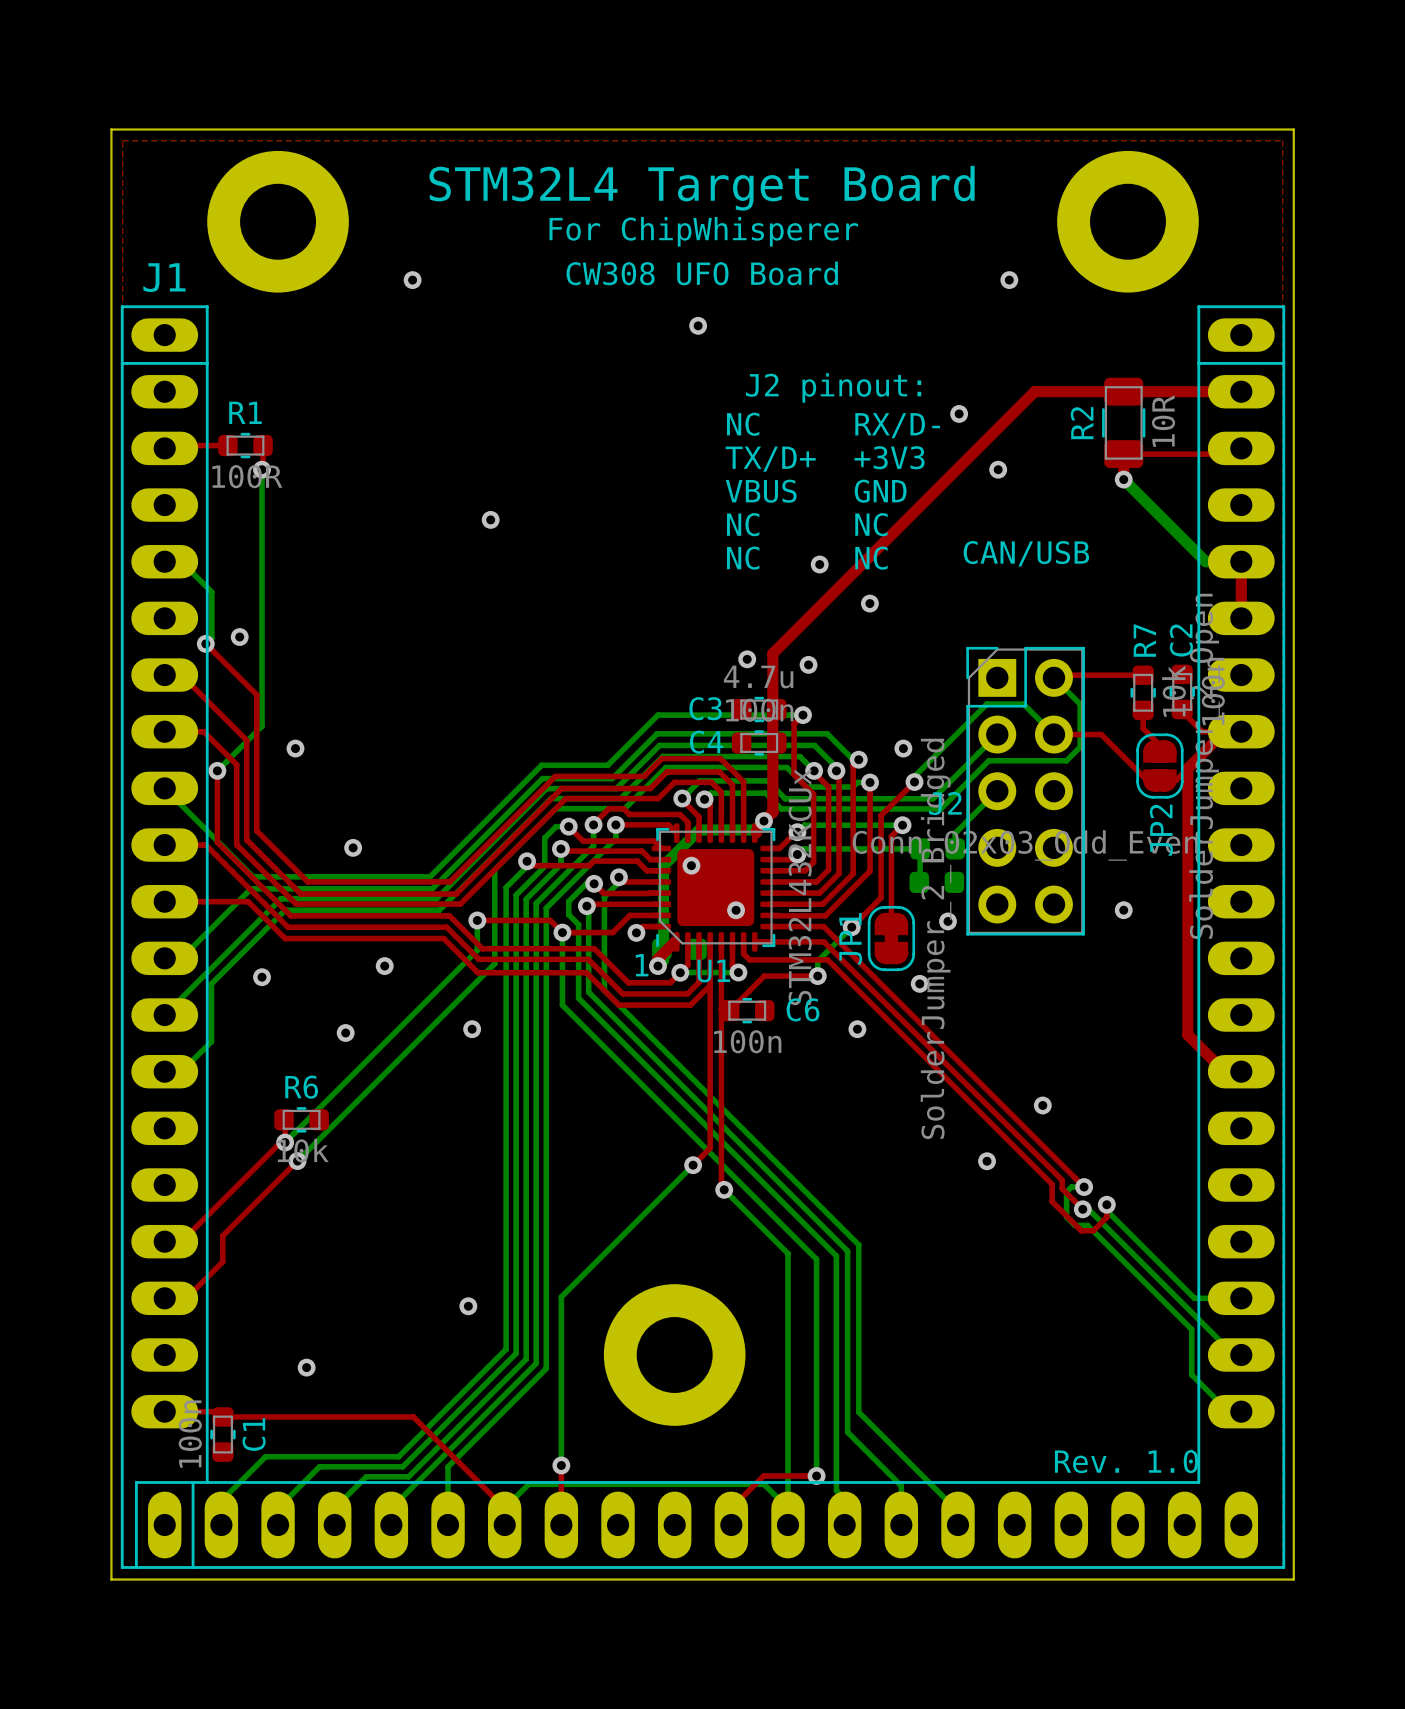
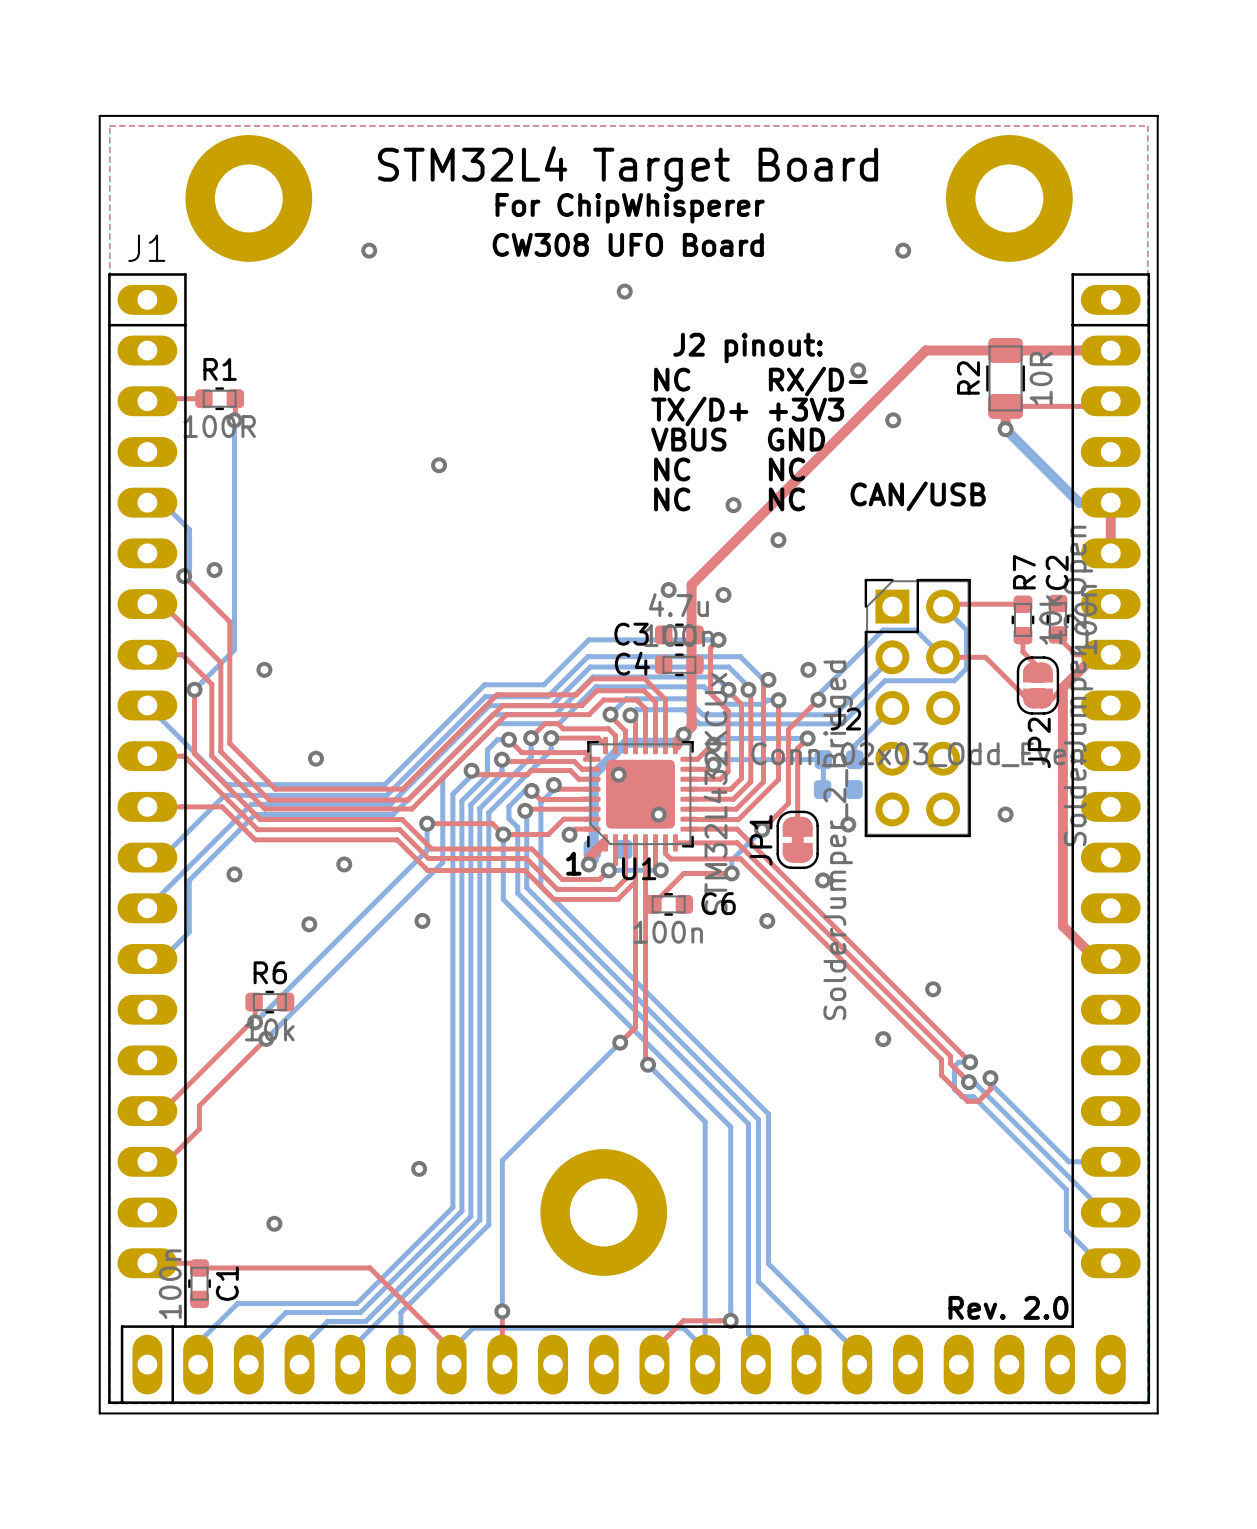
text: Rev. 1.0 (1126, 1461) -> Rev. 2.0 (1008, 1307)

